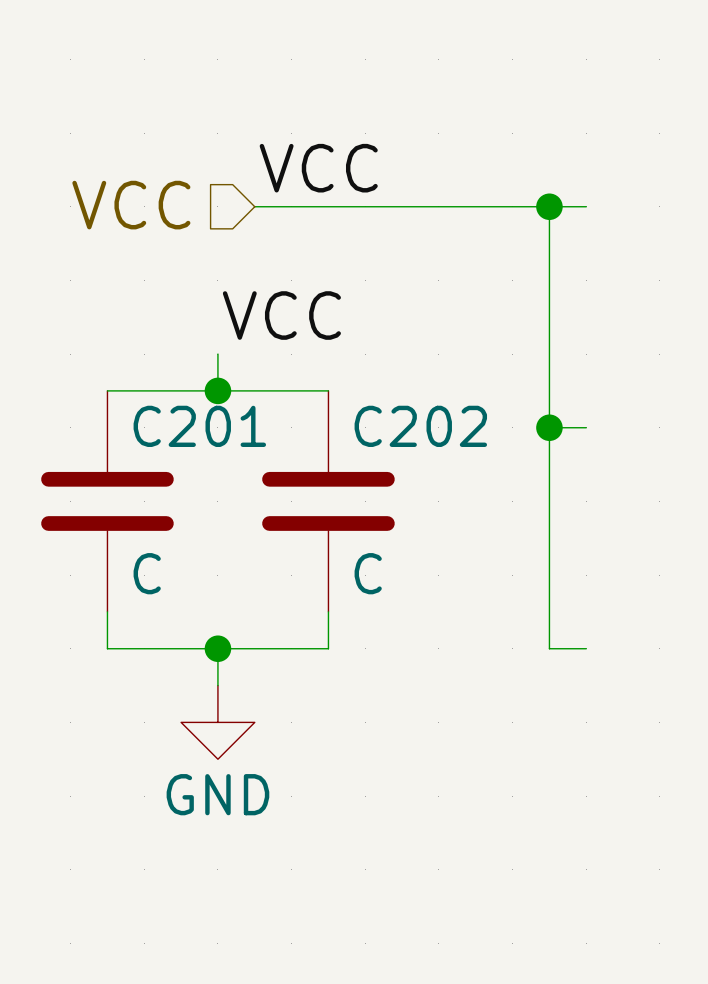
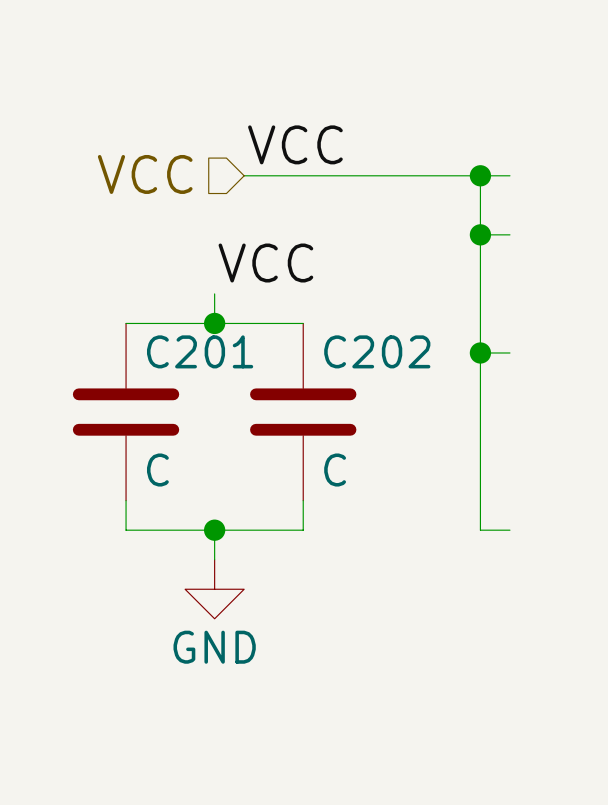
wire: none -> (480, 234) (509, 234)
junction: none -> (480, 234)

